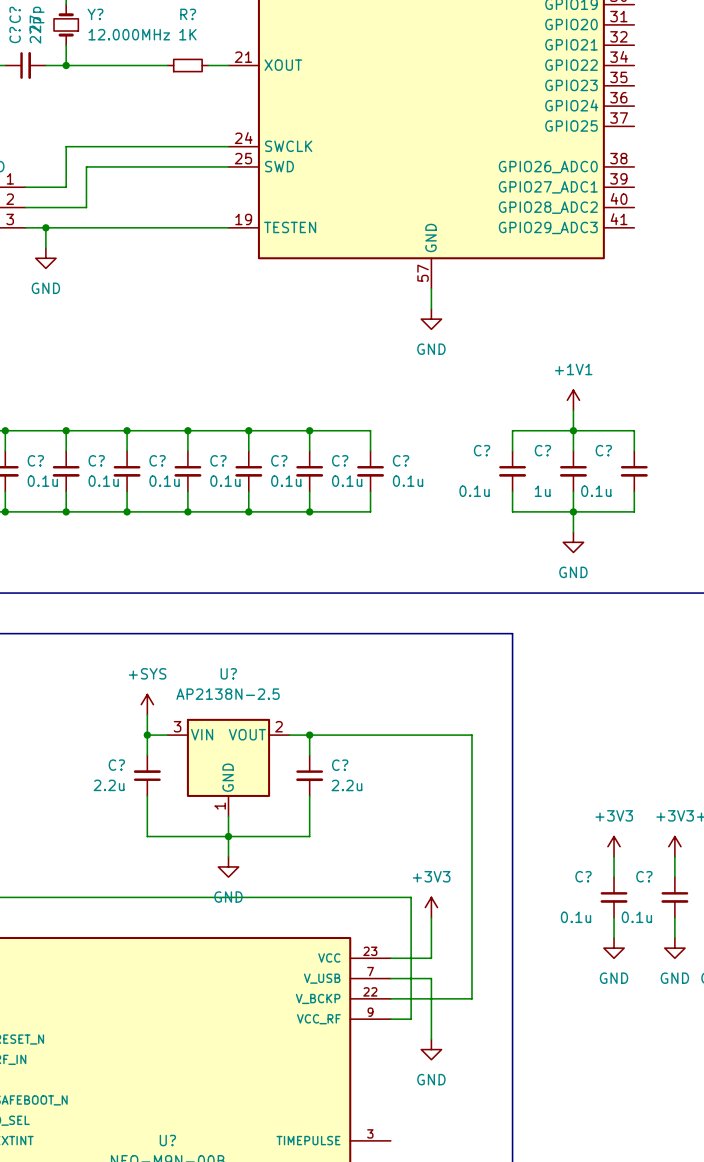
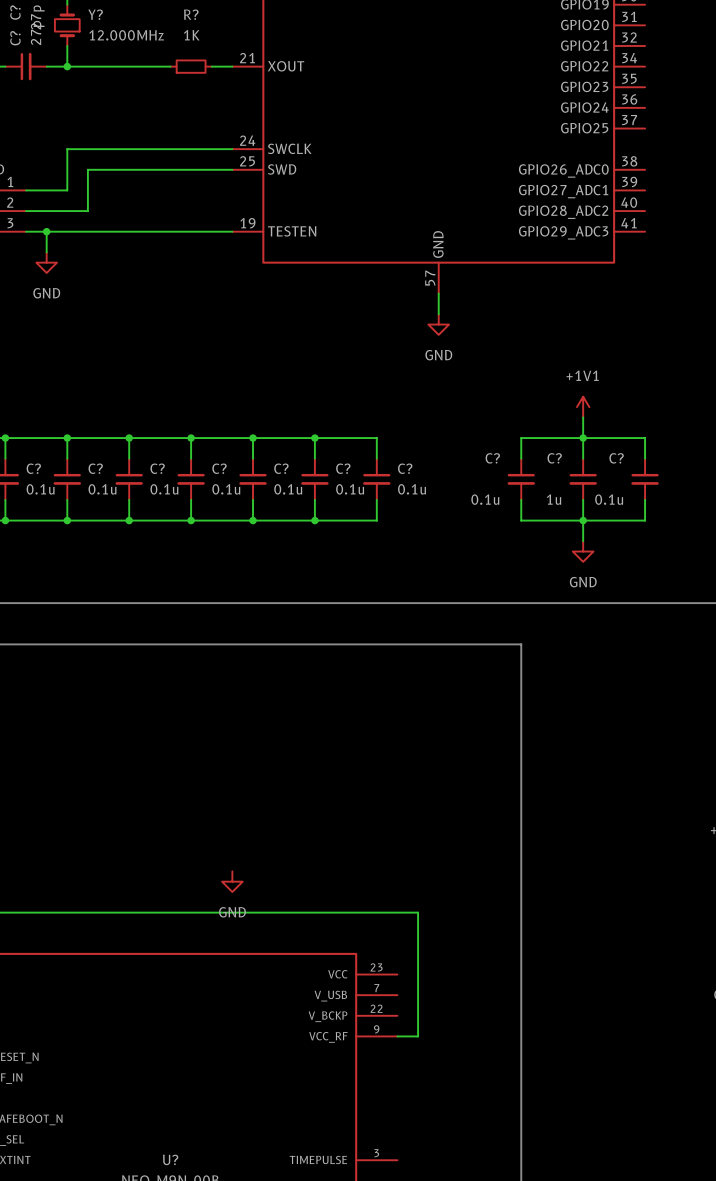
power symbol: +SYS (147, 704) -> none
wire: (147, 714) (147, 755) -> none
wire: (147, 735) (167, 735) -> none
junction: (147, 735) -> none
wire: (289, 735) (471, 735) (471, 998) (390, 998) -> none
wire: (309, 735) (309, 755) -> none
junction: (309, 735) -> none
U?: AP2138N-2.5 (228, 767) -> none
C?: 2.2u (147, 775) -> none
C?: 2.2u (309, 775) -> none
wire: (147, 795) (147, 836) (309, 836) (309, 795) -> none
wire: (228, 816) (228, 856) -> none
junction: (228, 836) -> none
power symbol: +3V3 (614, 846) -> none
power symbol: +3V3 (674, 846) -> none
wire: (614, 856) (614, 877) -> none
wire: (674, 856) (674, 877) -> none
C?: 0.1u (614, 897) -> none
C?: 0.1u (674, 897) -> none
power symbol: +3V3 (431, 907) -> none
wire: (431, 917) (431, 958) (390, 958) -> none
wire: (614, 917) (614, 937) -> none
wire: (674, 917) (674, 937) -> none
power symbol: GND (614, 948) -> none
power symbol: GND (674, 948) -> none
wire: (390, 978) (431, 978) (431, 1039) -> none
power symbol: GND (431, 1049) -> none

